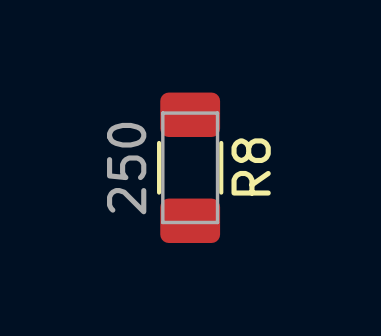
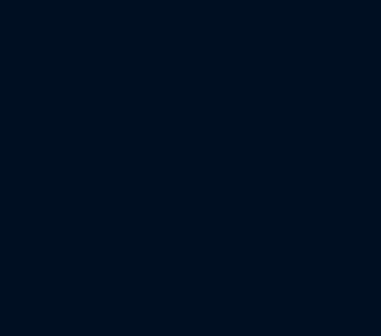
R8: 250 (190, 167) -> none

